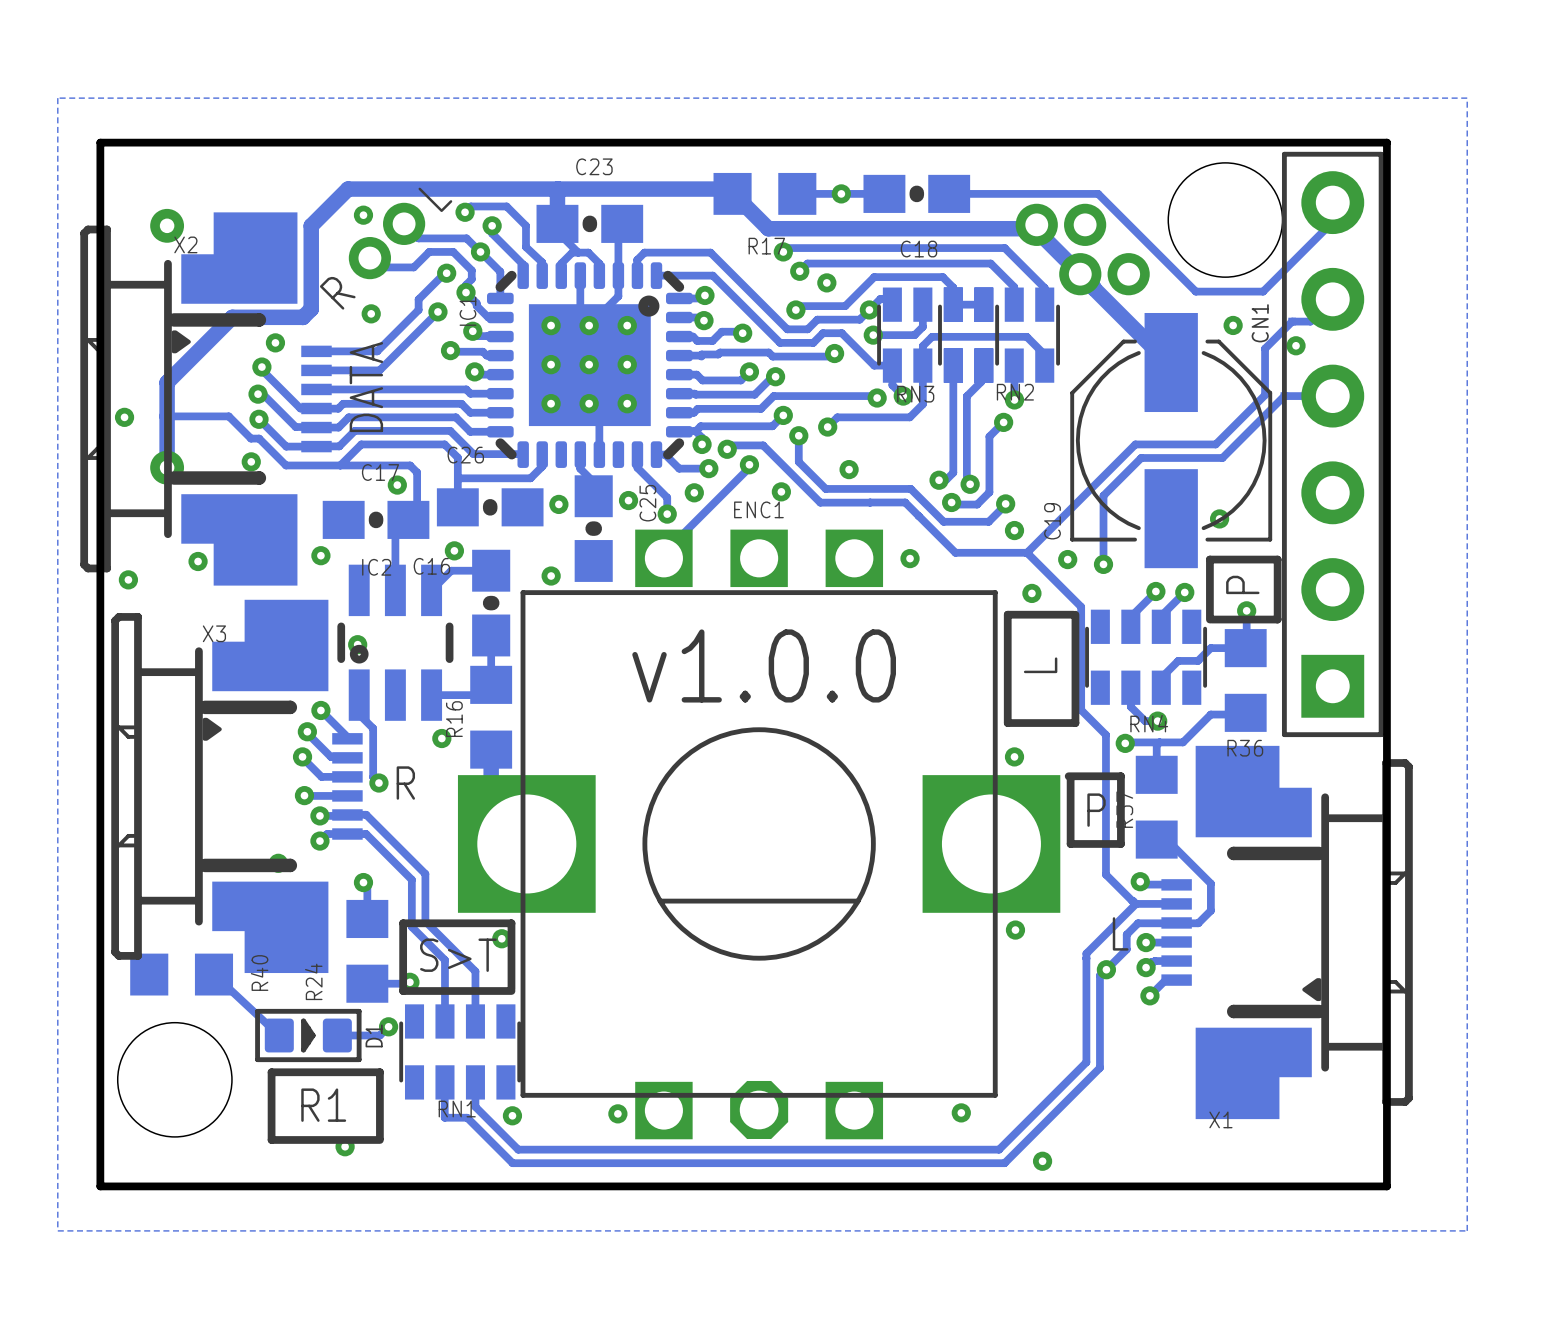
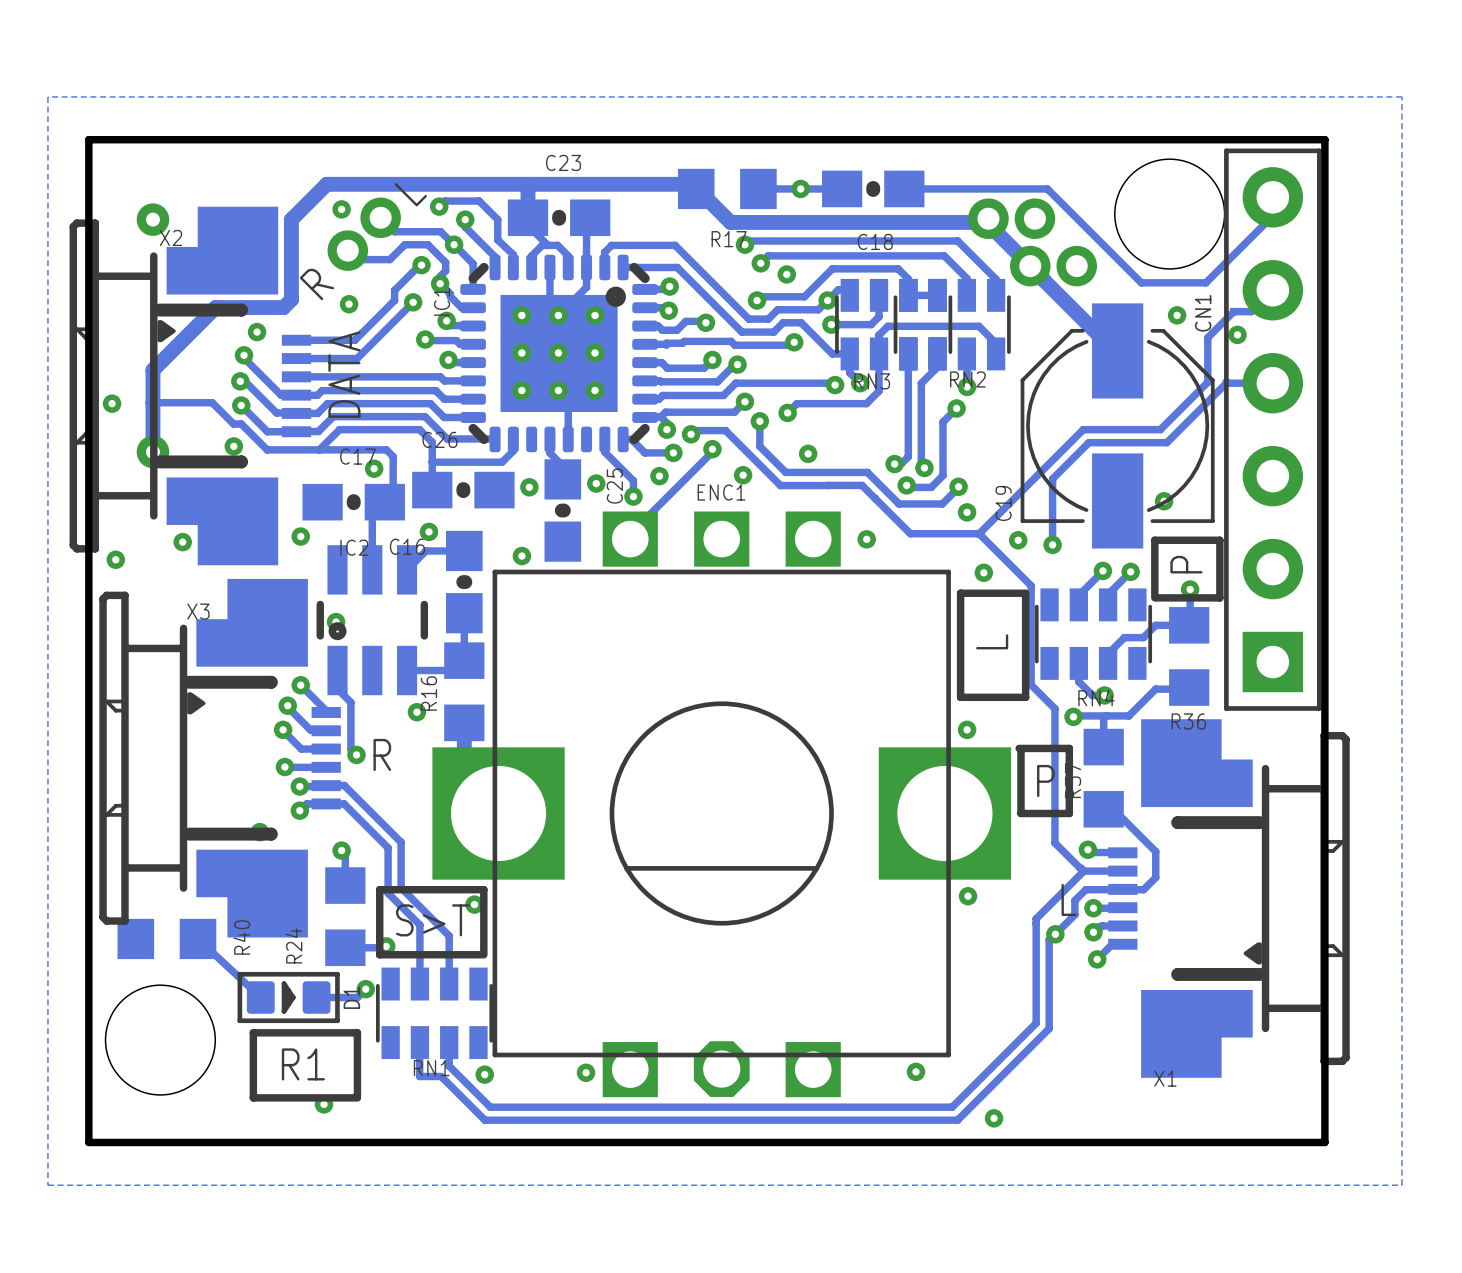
text: v1.0.0 (764, 665) -> none

